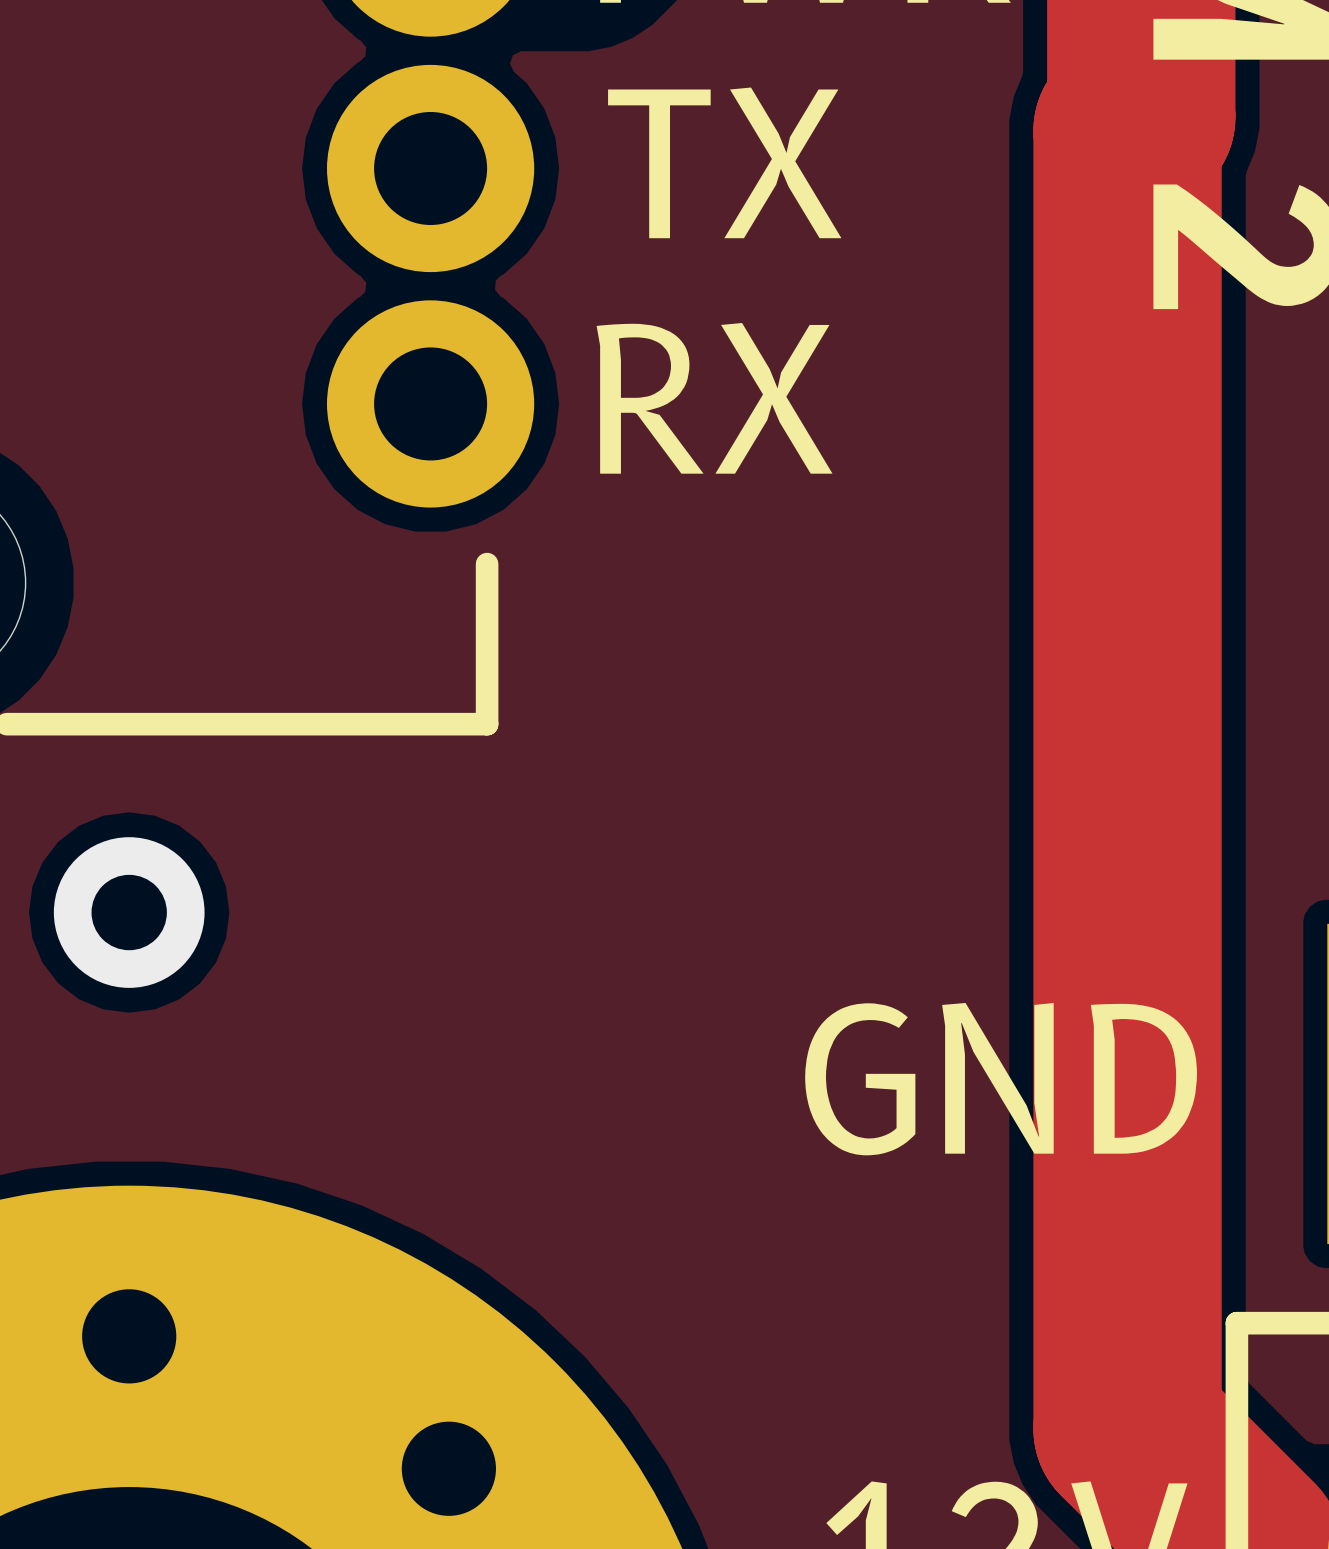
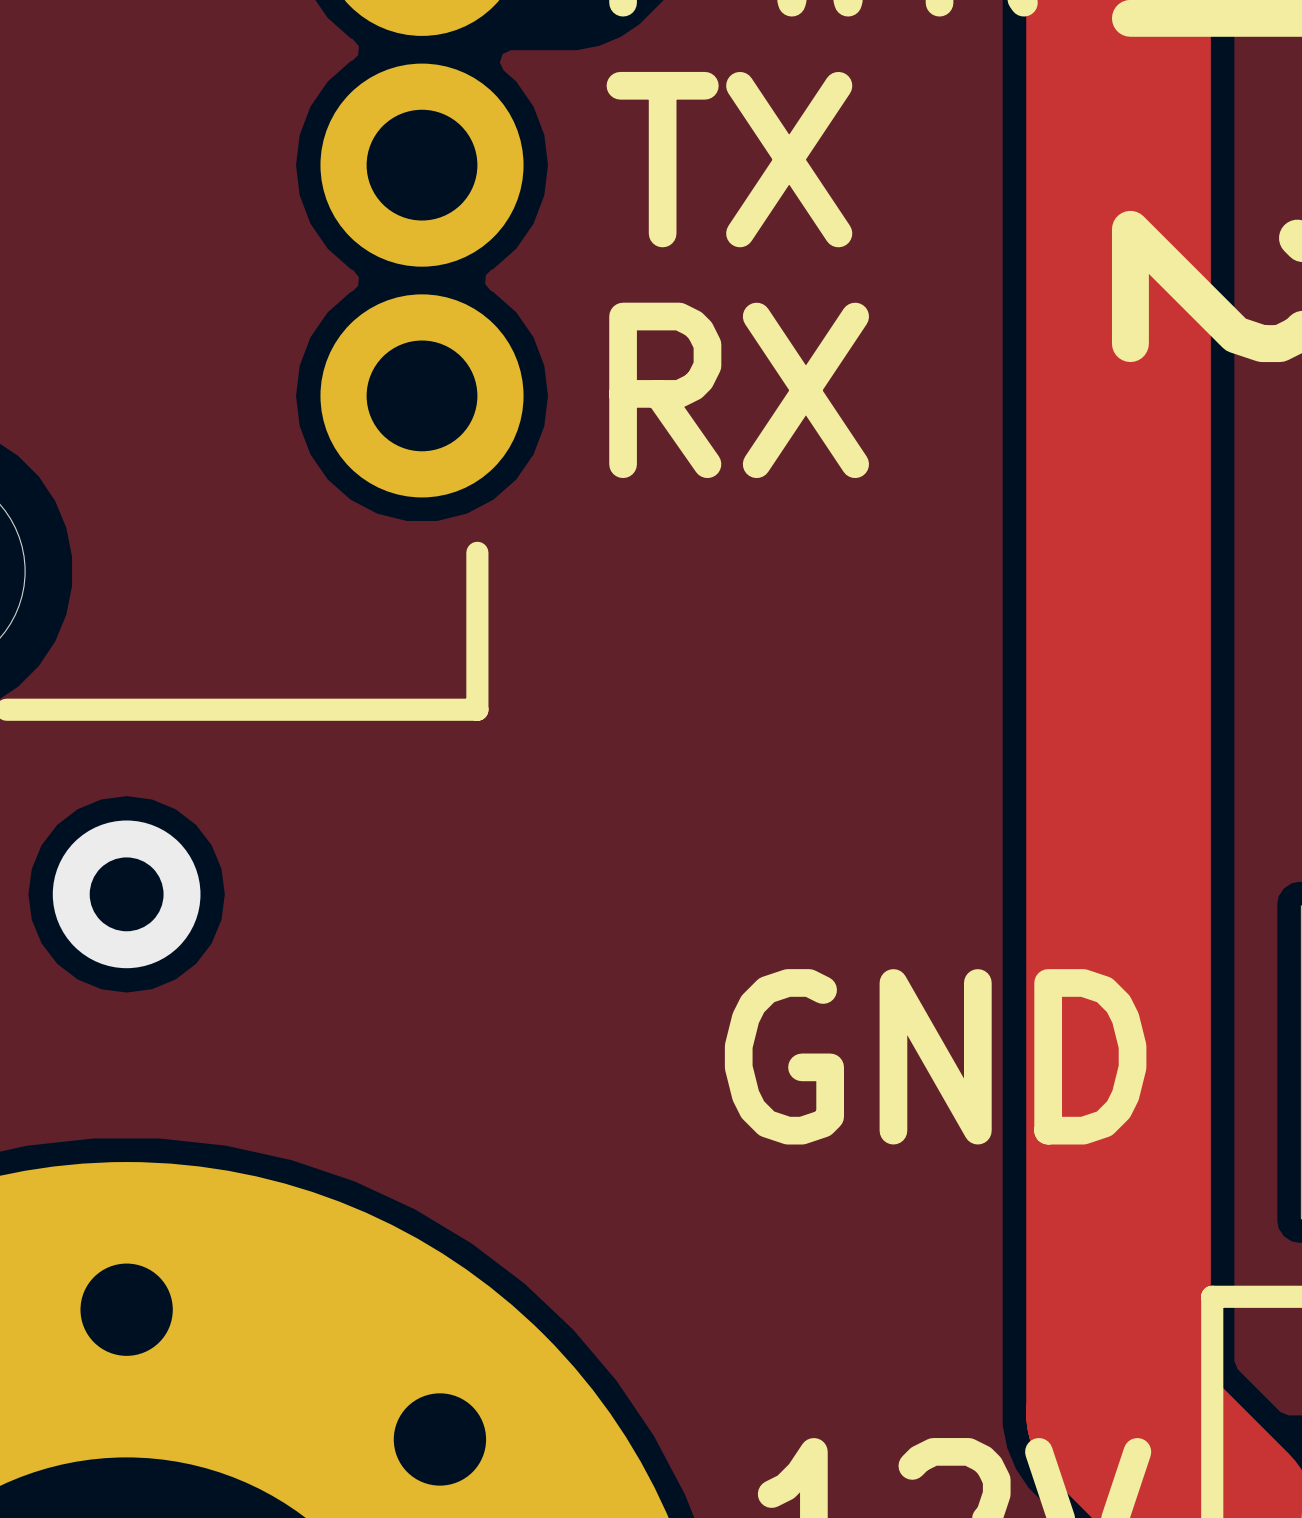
track: (1141, 117) (1127, 130) (1127, 1428) (1141, 1442) -> (1118, 114) (1118, 1413)

